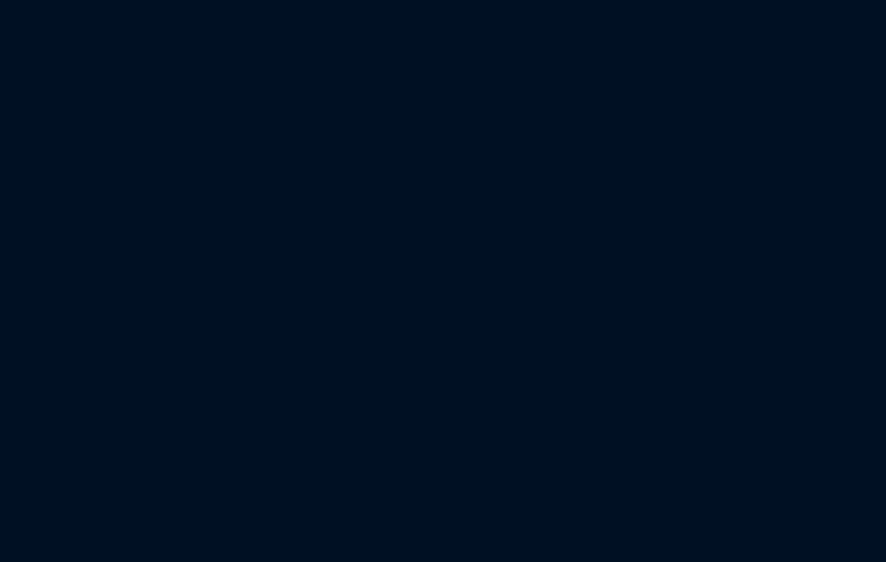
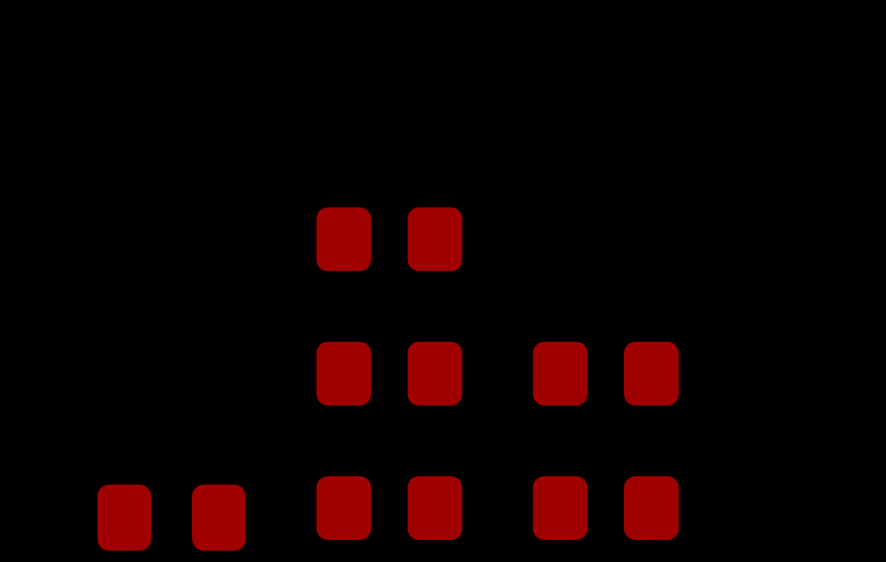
part: none -> (389, 239)
part: none -> (389, 373)
part: none -> (605, 373)
part: none -> (389, 508)
part: none -> (605, 508)
part: none -> (171, 517)

